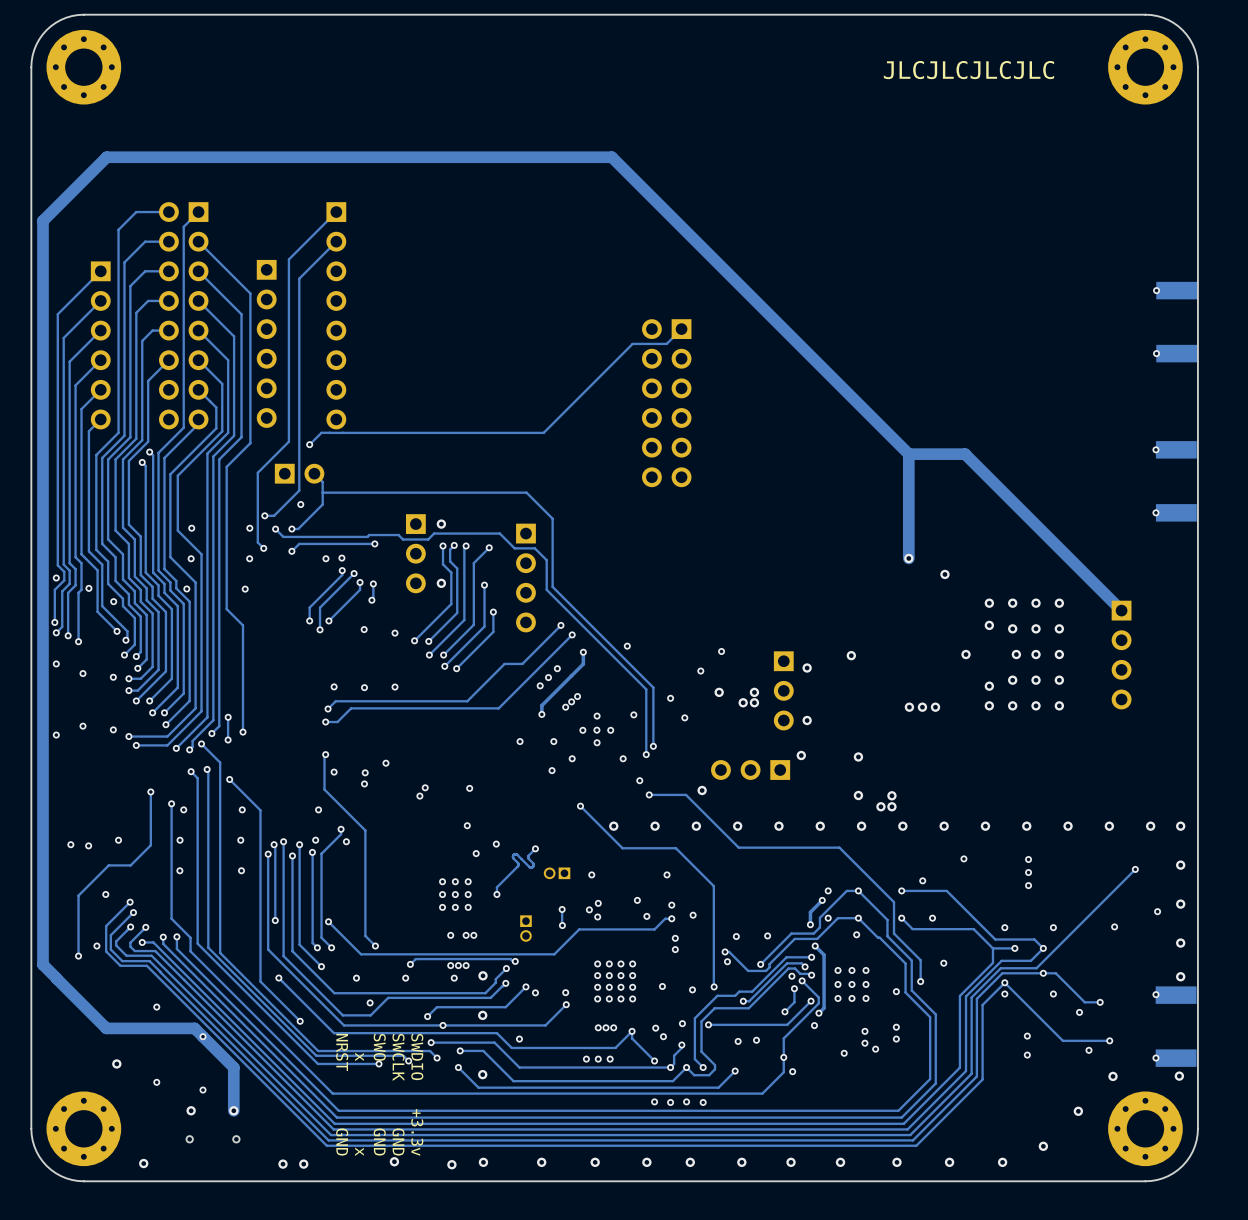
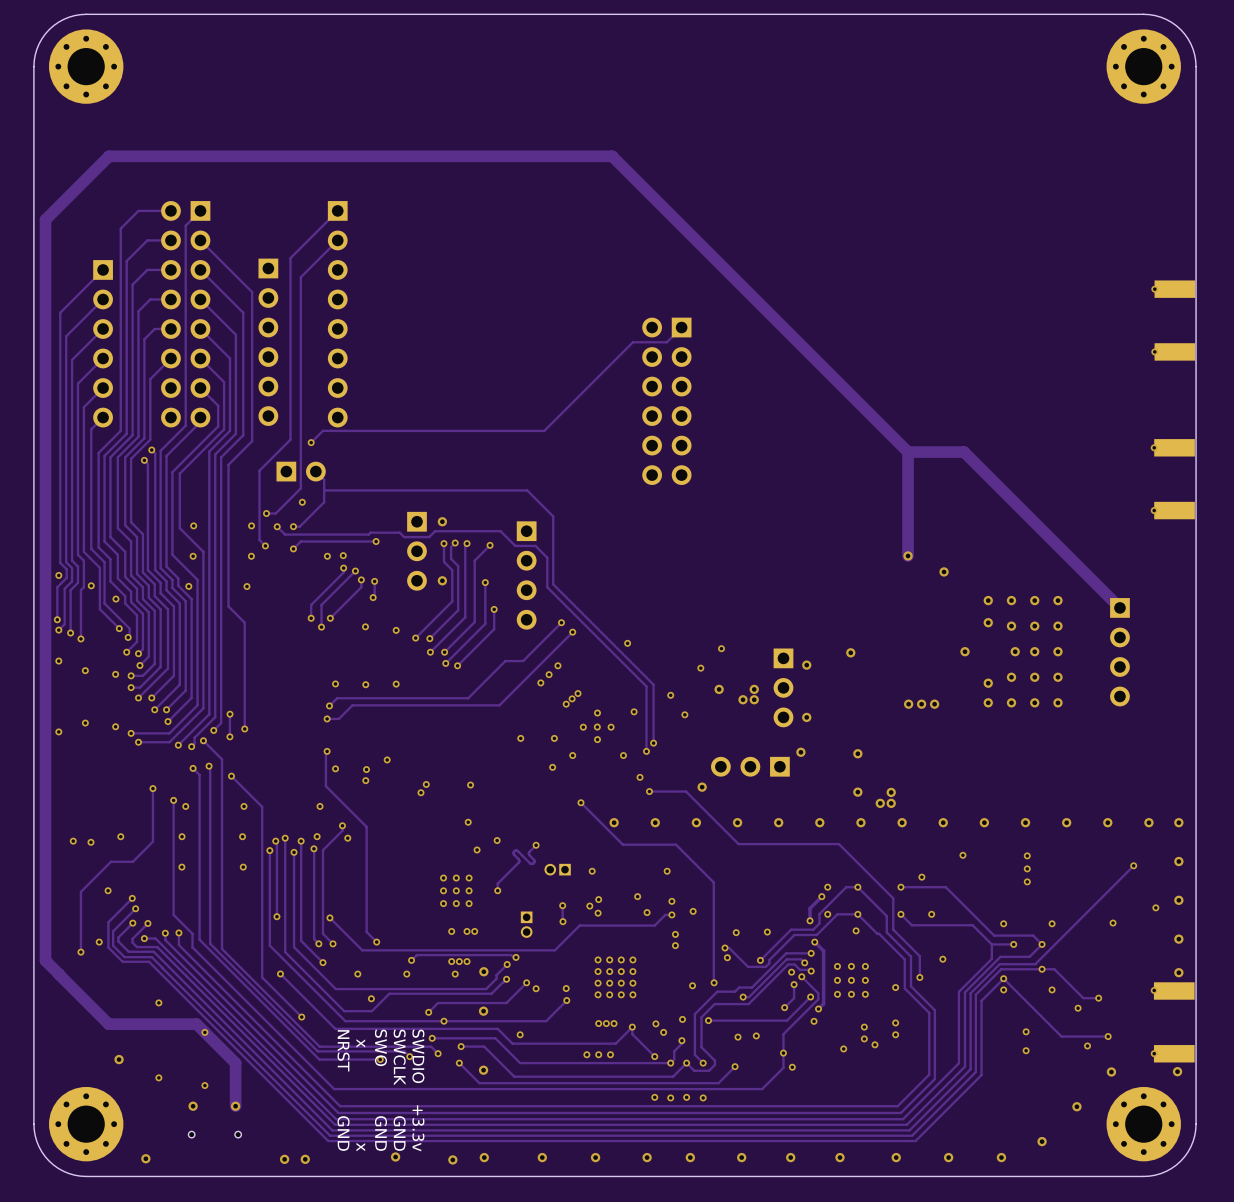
text: JLCJLCJLCJLC (968, 70) -> none
track: (583, 652) (583, 664) (541, 705) (541, 714) -> none
via: (583, 652) -> none
via: (541, 714) -> none
via: (662, 986) -> none

